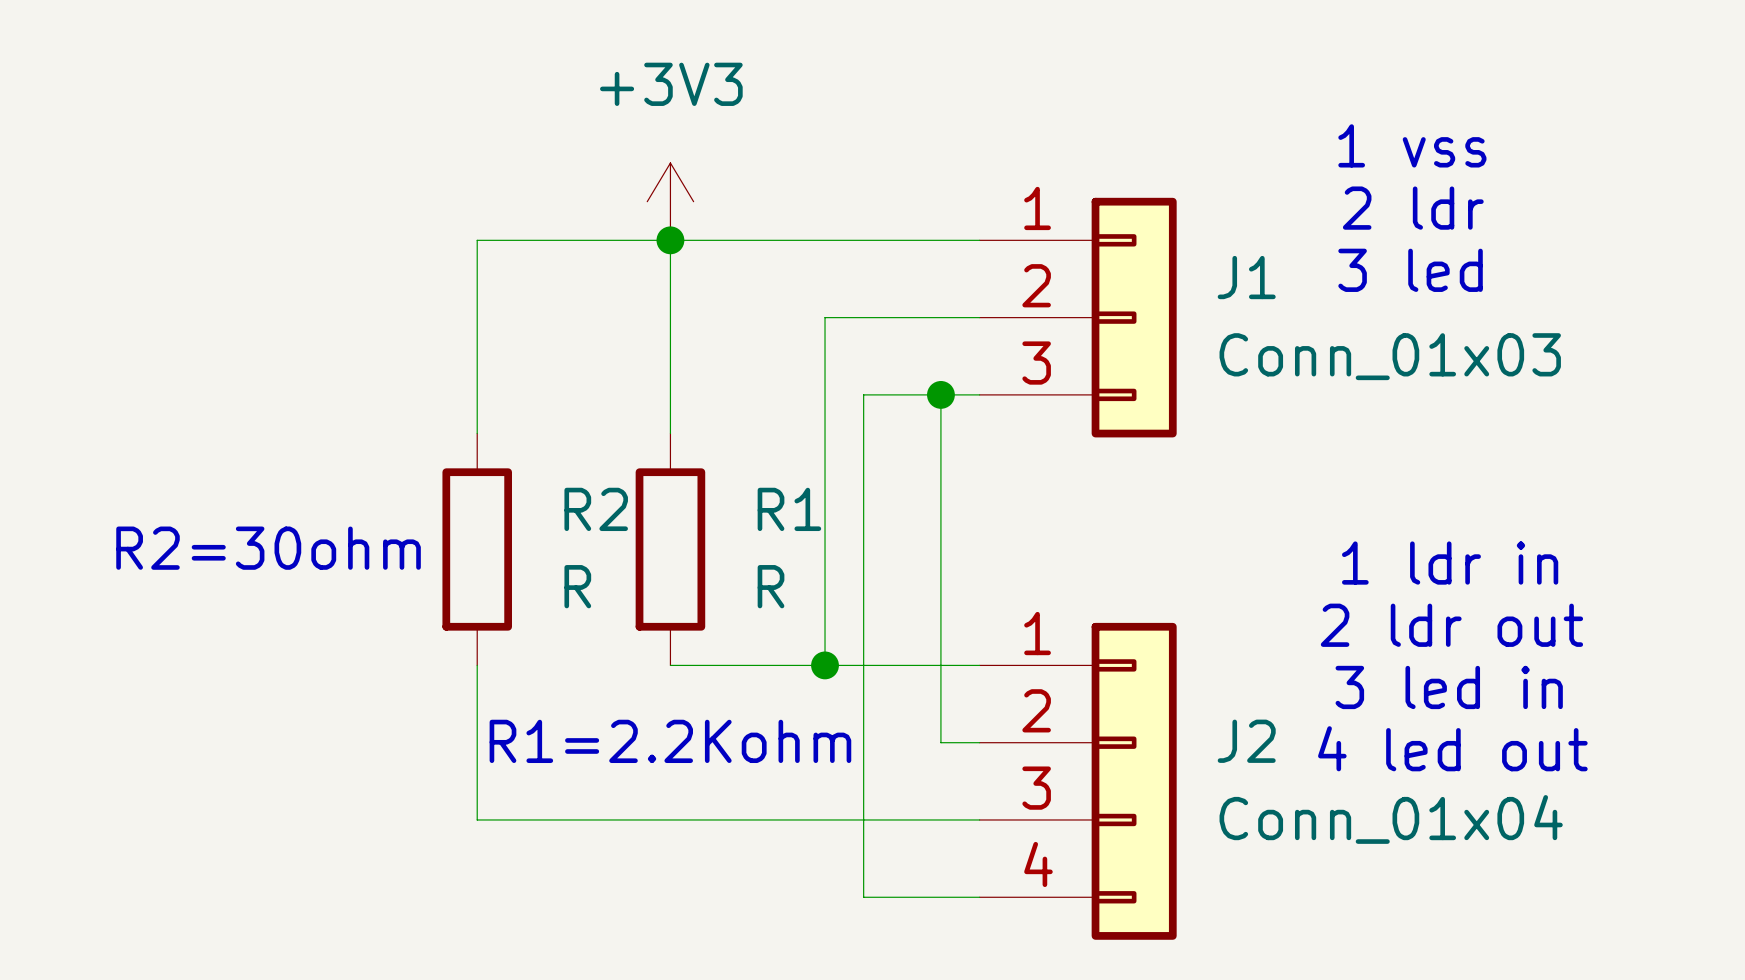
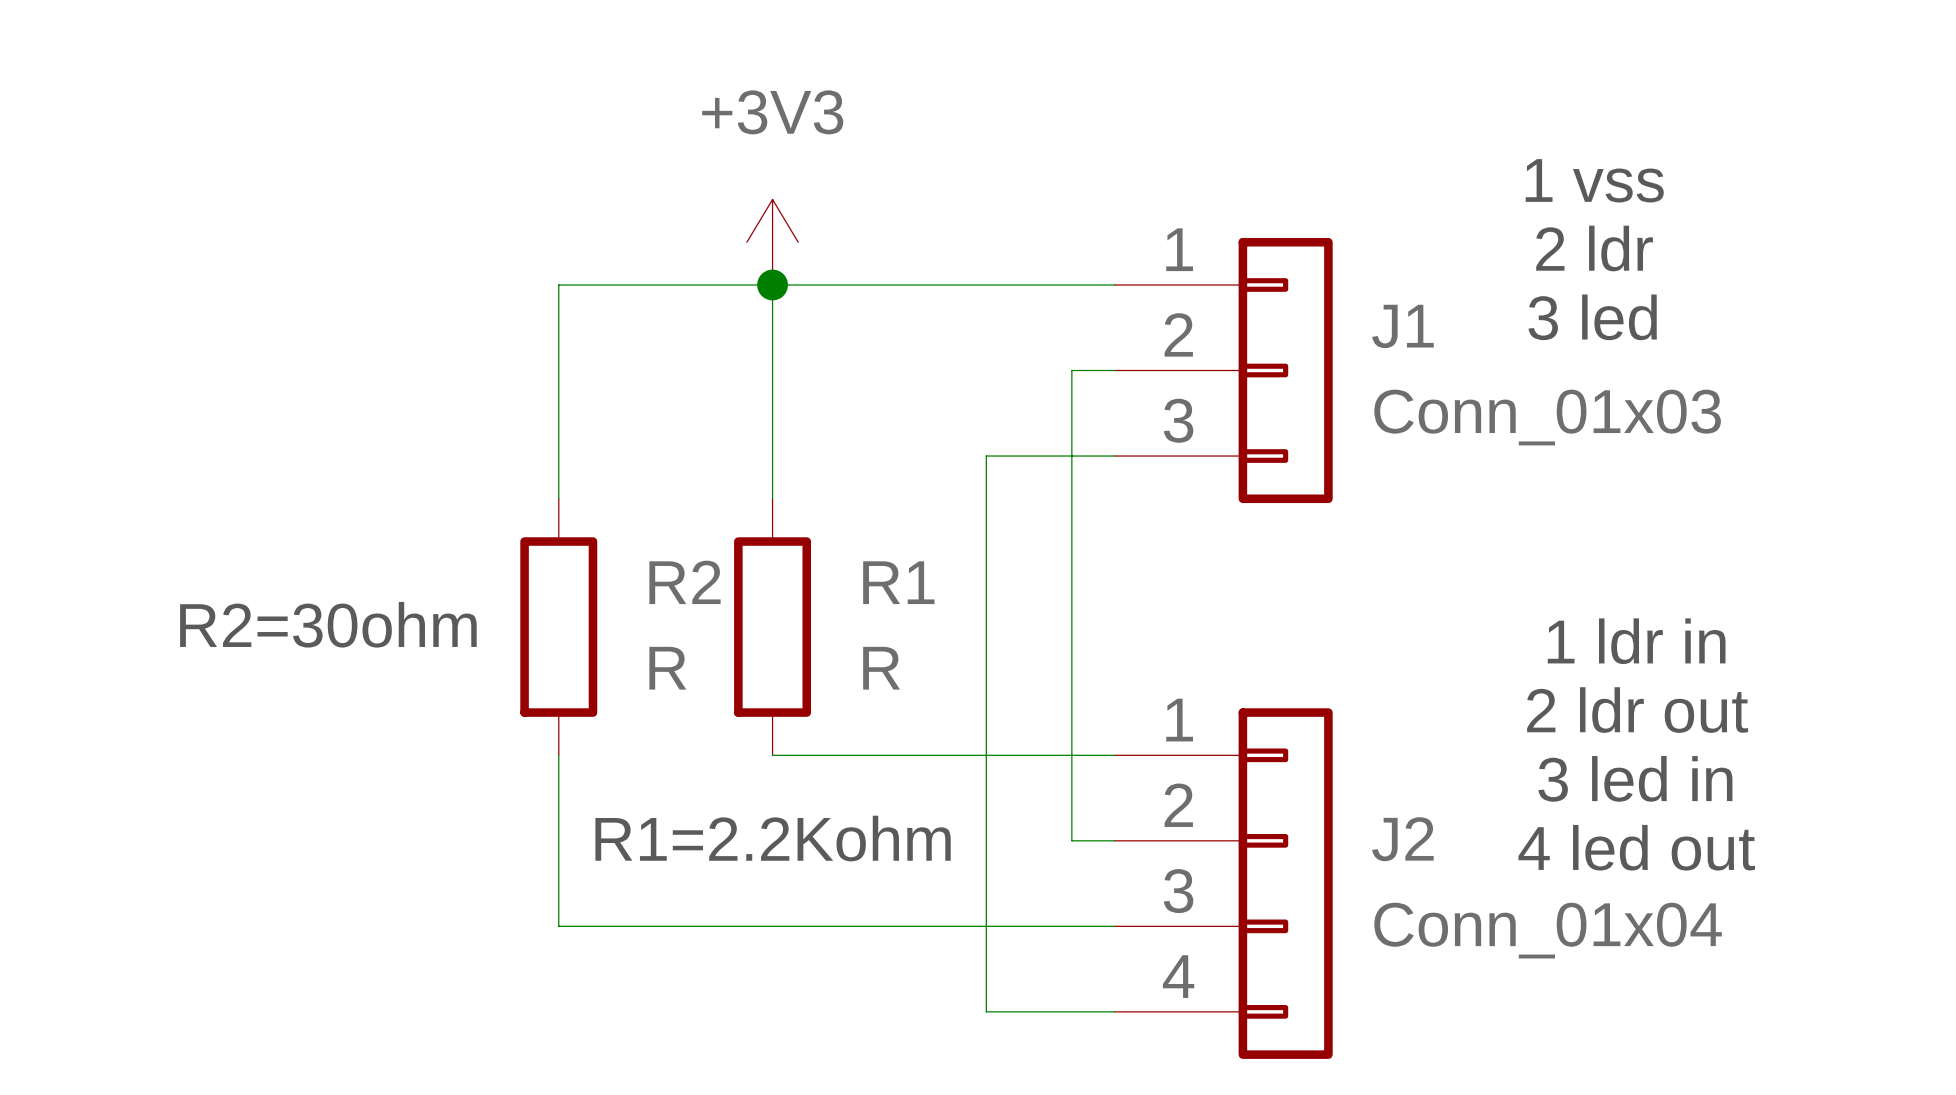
wire: (940, 317) (825, 317) (825, 665) -> (1071, 370) (1071, 456)
junction: (940, 394) -> none
junction: (825, 665) -> none

